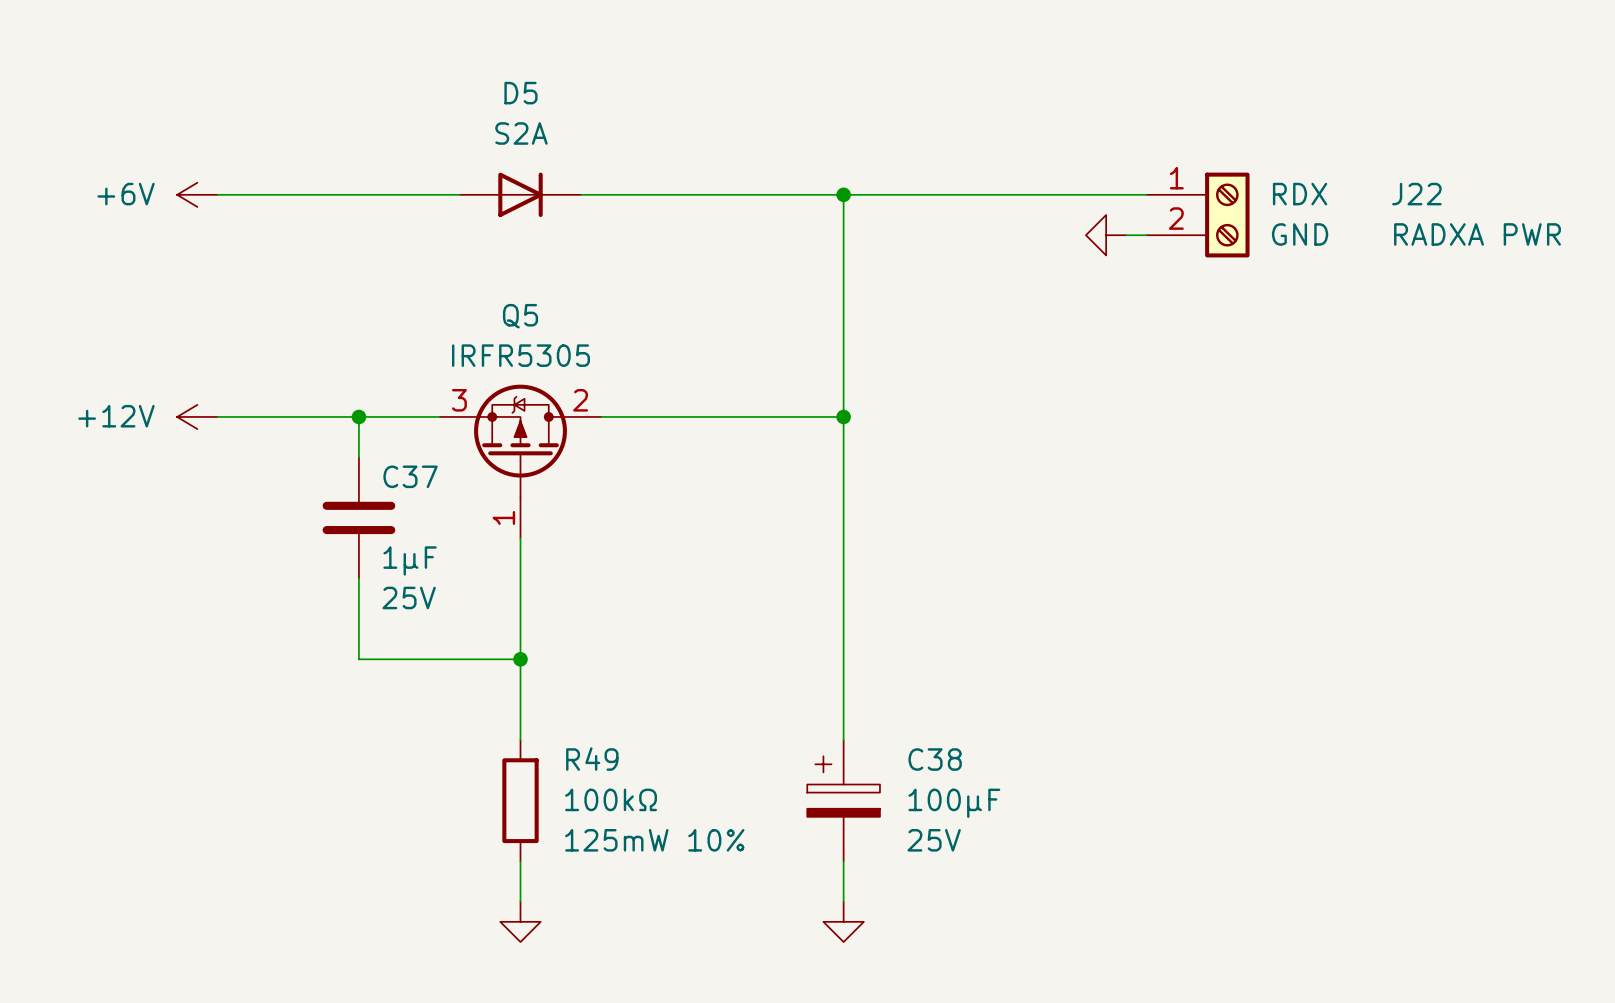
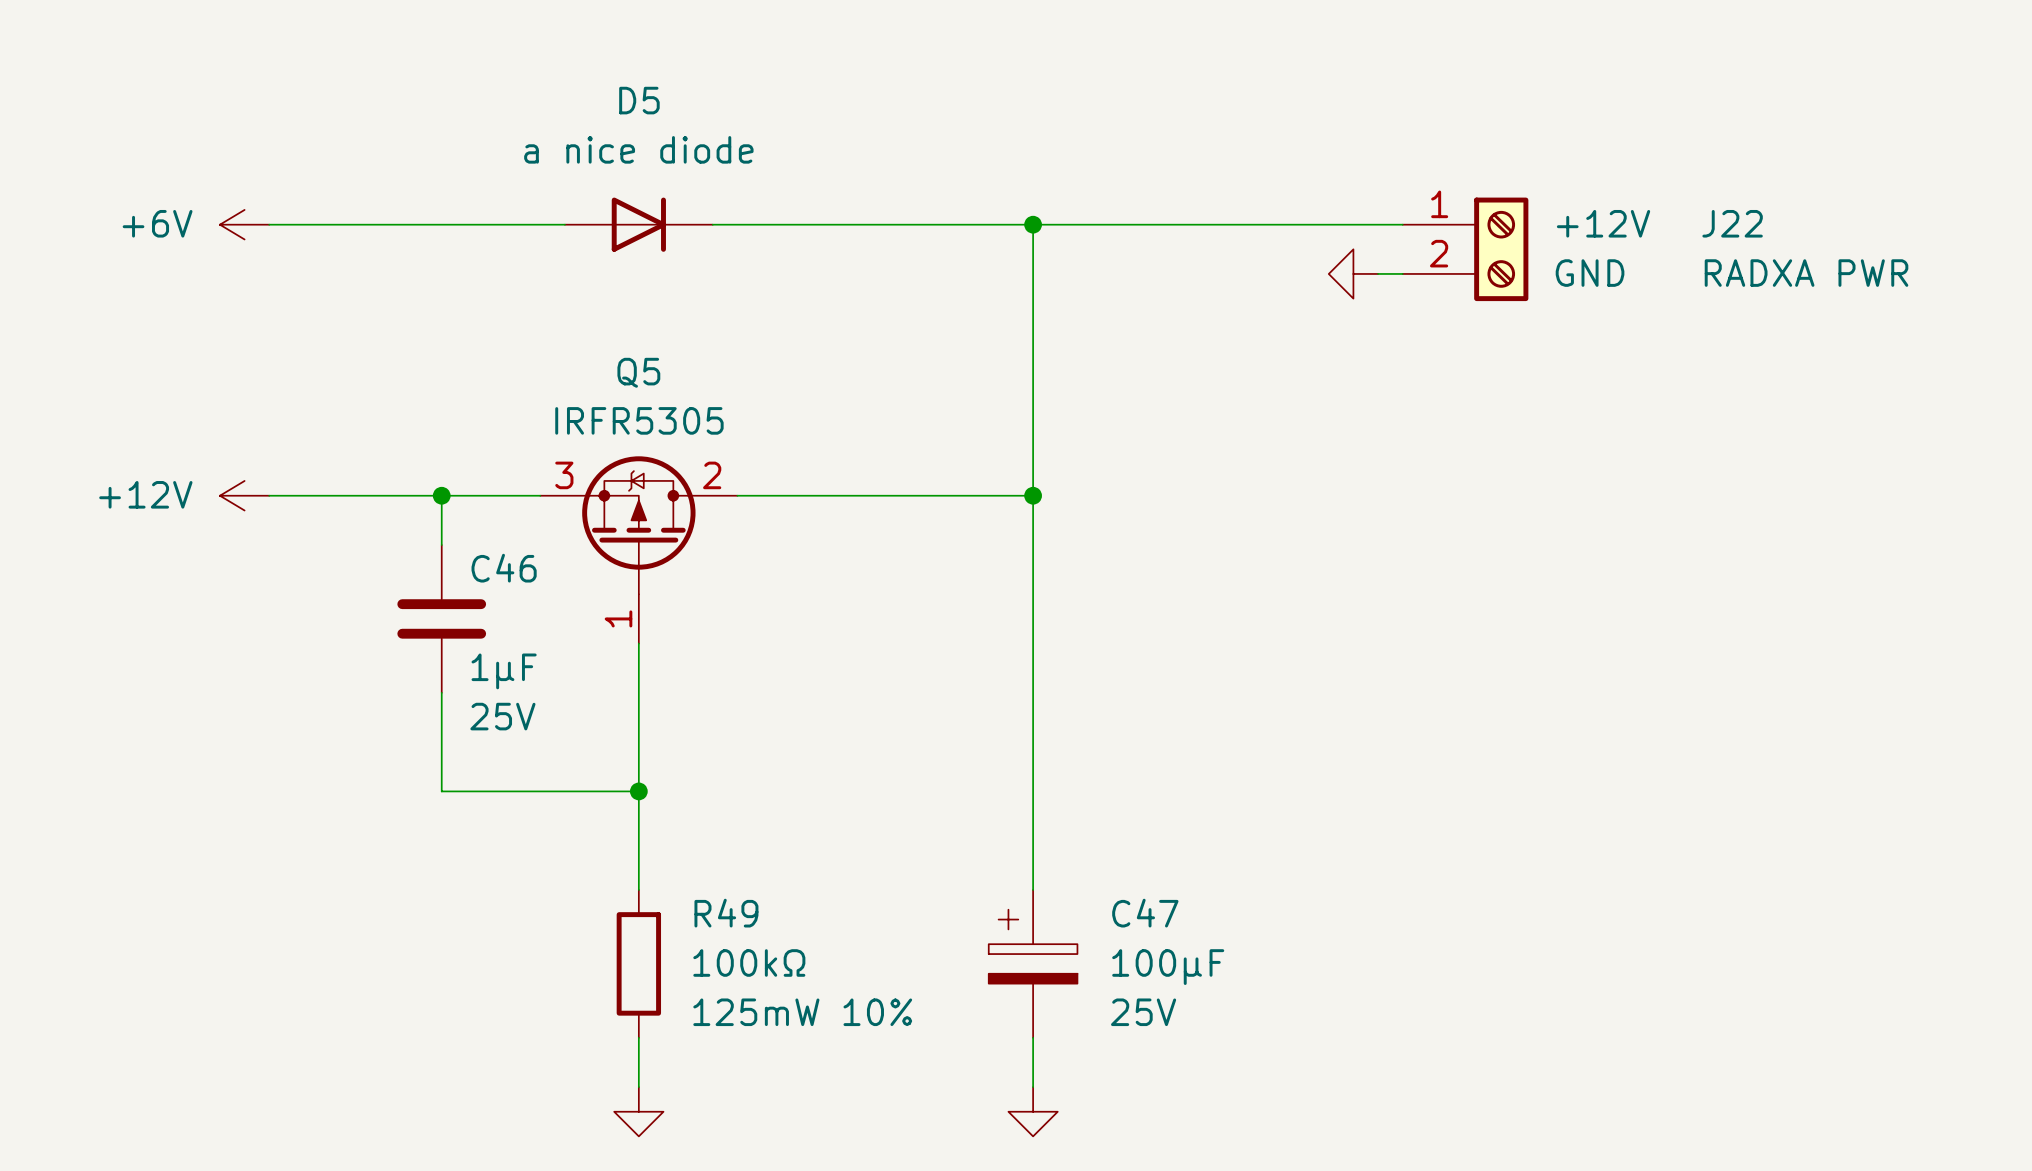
D5 value: S2A (521, 133) -> a nice diode (638, 149)
J22 text: RDX (1300, 194) -> +12V (1603, 223)
C37 name: C37 (410, 476) -> C46 (504, 568)
C38 name: C38 (935, 759) -> C47 (1145, 913)

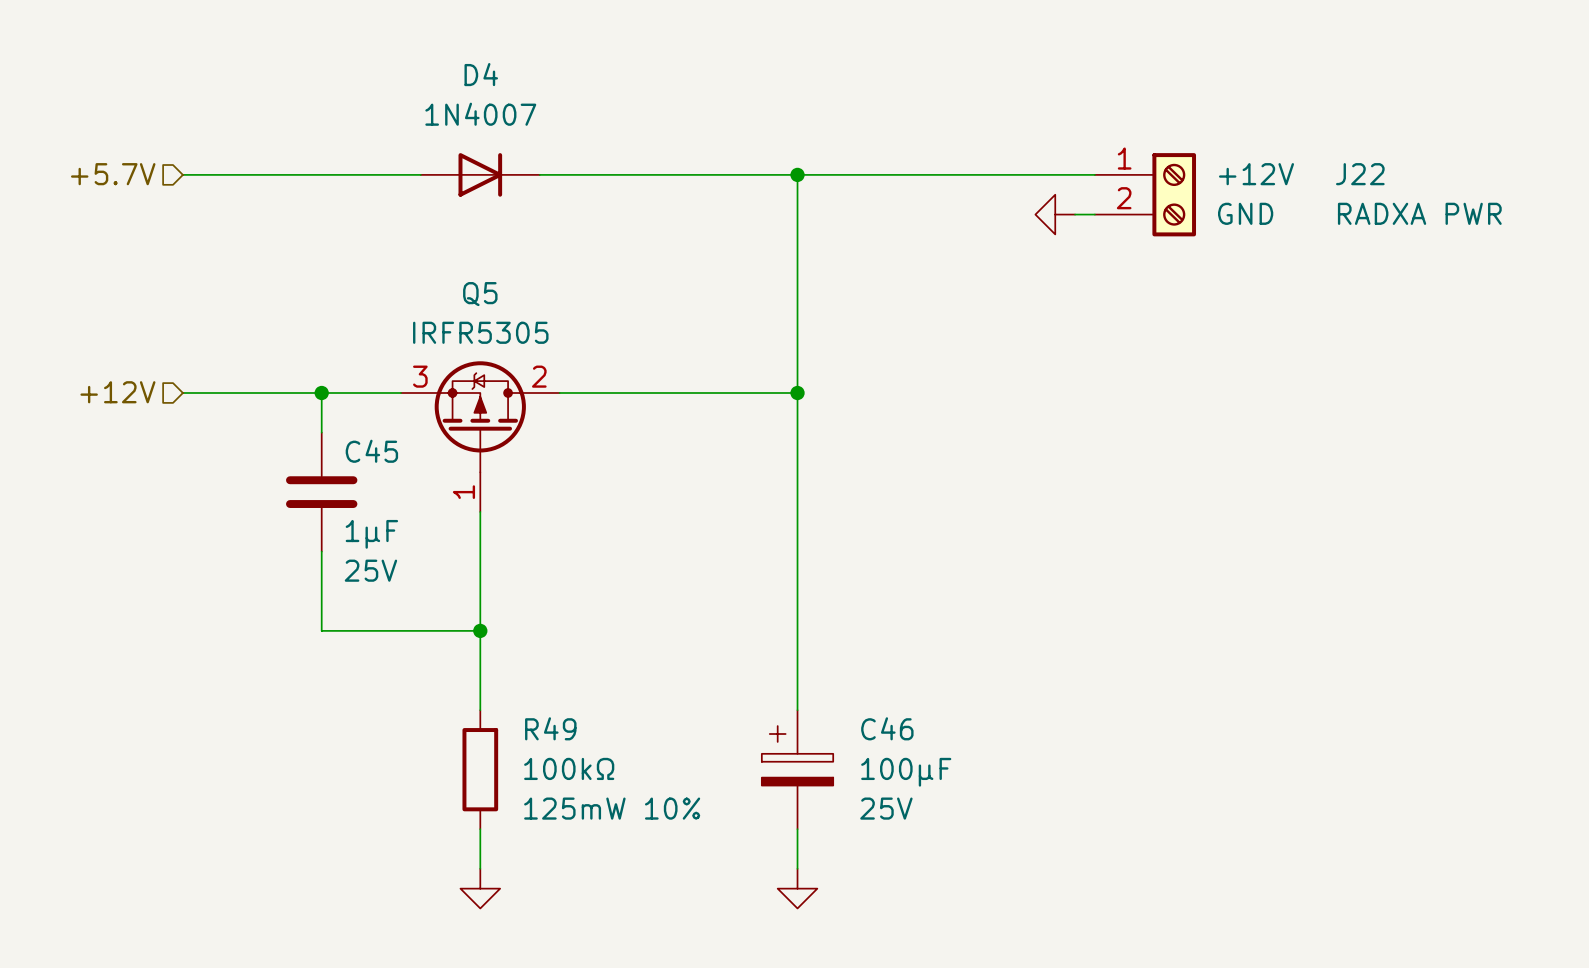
D5 name: D5 (639, 100) -> D4 (481, 74)
D5 value: a nice diode (638, 149) -> 1N4007 (480, 114)
hierarchical label: none -> +5.7V (113, 174)
power symbol: +6V (244, 224) -> none
hierarchical label: none -> +12V (117, 392)
power symbol: +12V (244, 495) -> none
C46 name: C46 (504, 568) -> C45 (371, 451)
C47 name: C47 (1145, 913) -> C46 (887, 728)

